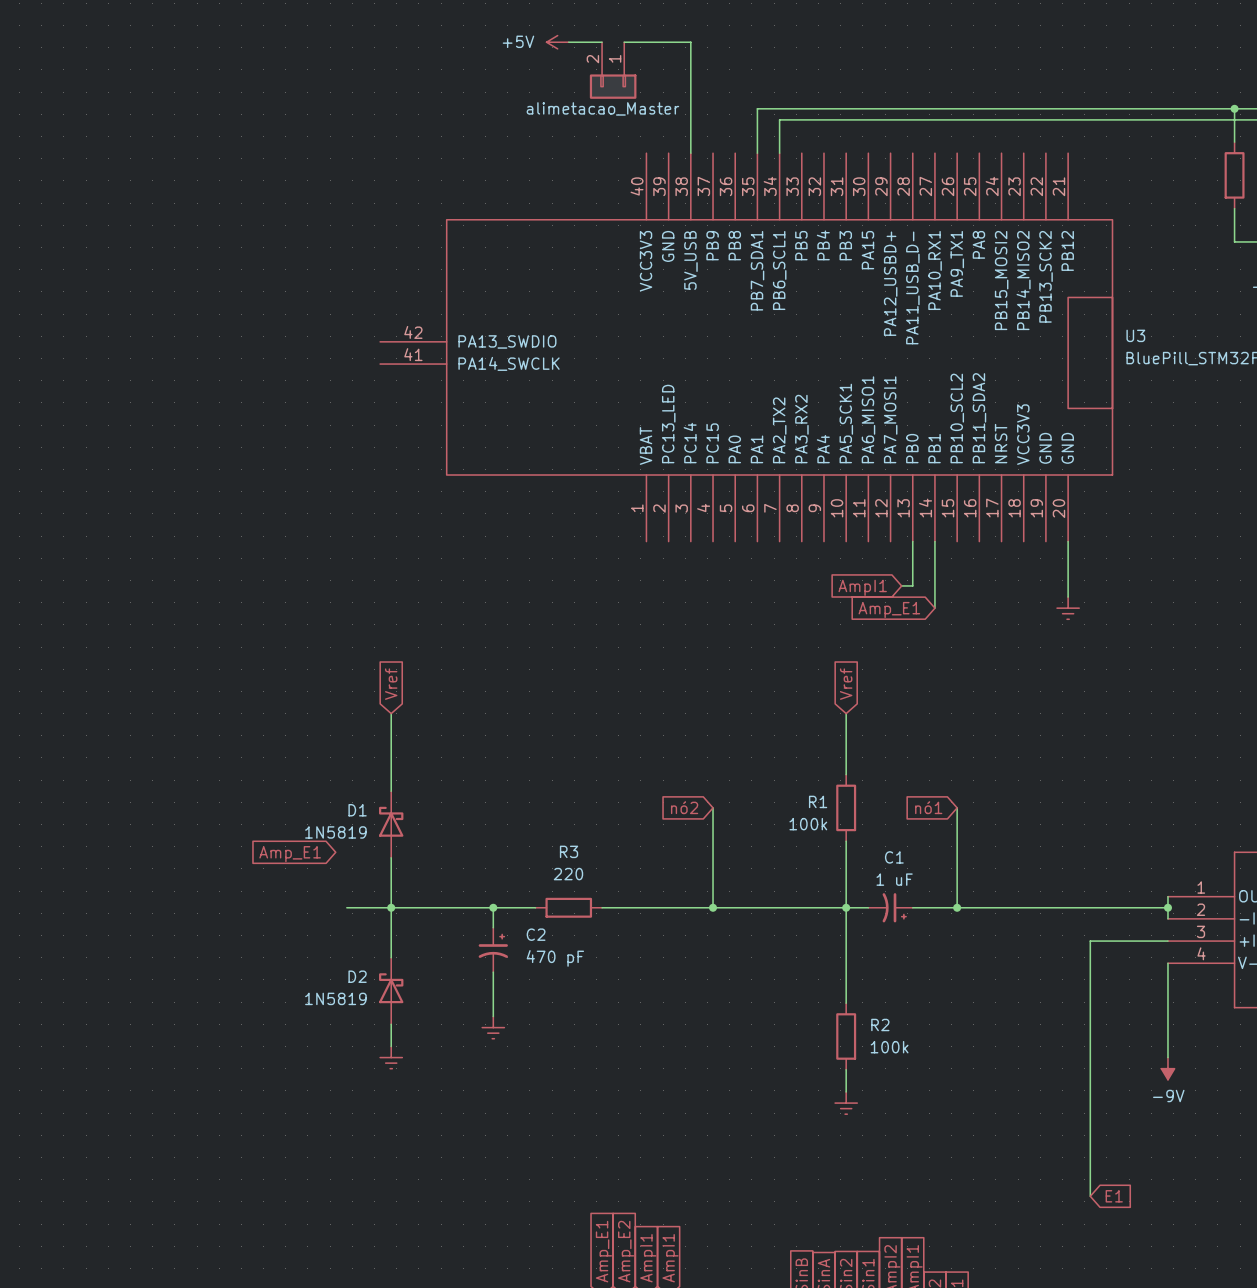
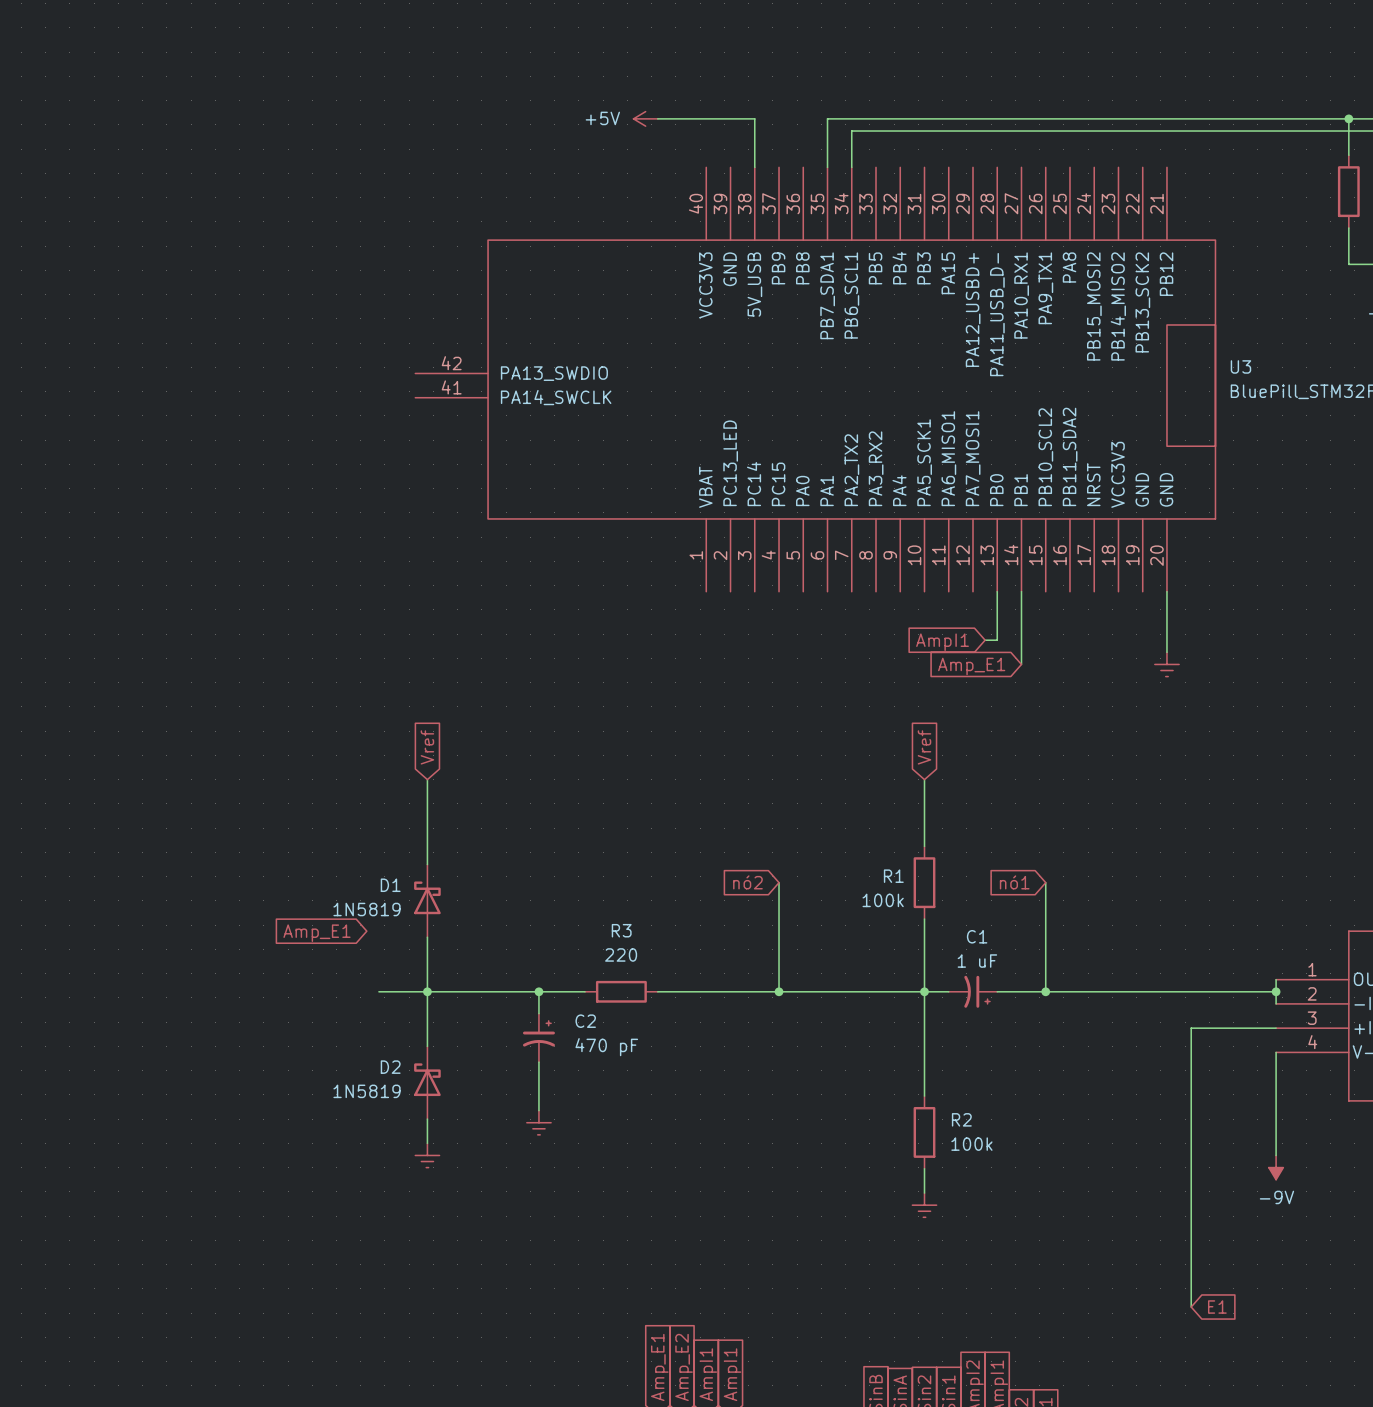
power symbol position: +5V (557, 42) -> +5V (645, 118)
wire: (568, 42) (602, 42) -> none
wire: (624, 42) (690, 42) (690, 108) -> (657, 118) (754, 118)
part: alimetacao_Master (613, 70) -> none

